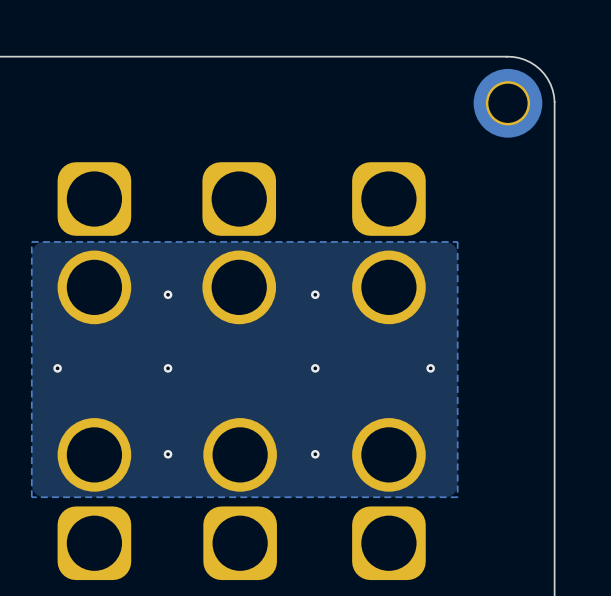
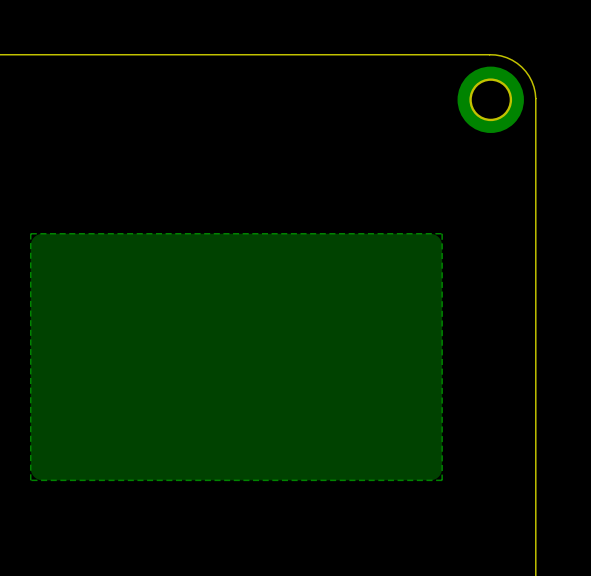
part: (94, 243) -> none
part: (239, 243) -> none
part: (388, 243) -> none
via: (168, 294) -> none
via: (315, 294) -> none
via: (57, 368) -> none
via: (168, 368) -> none
via: (315, 368) -> none
via: (430, 368) -> none
via: (168, 454) -> none
via: (315, 454) -> none
part: (94, 499) -> none
part: (240, 499) -> none
part: (388, 499) -> none

